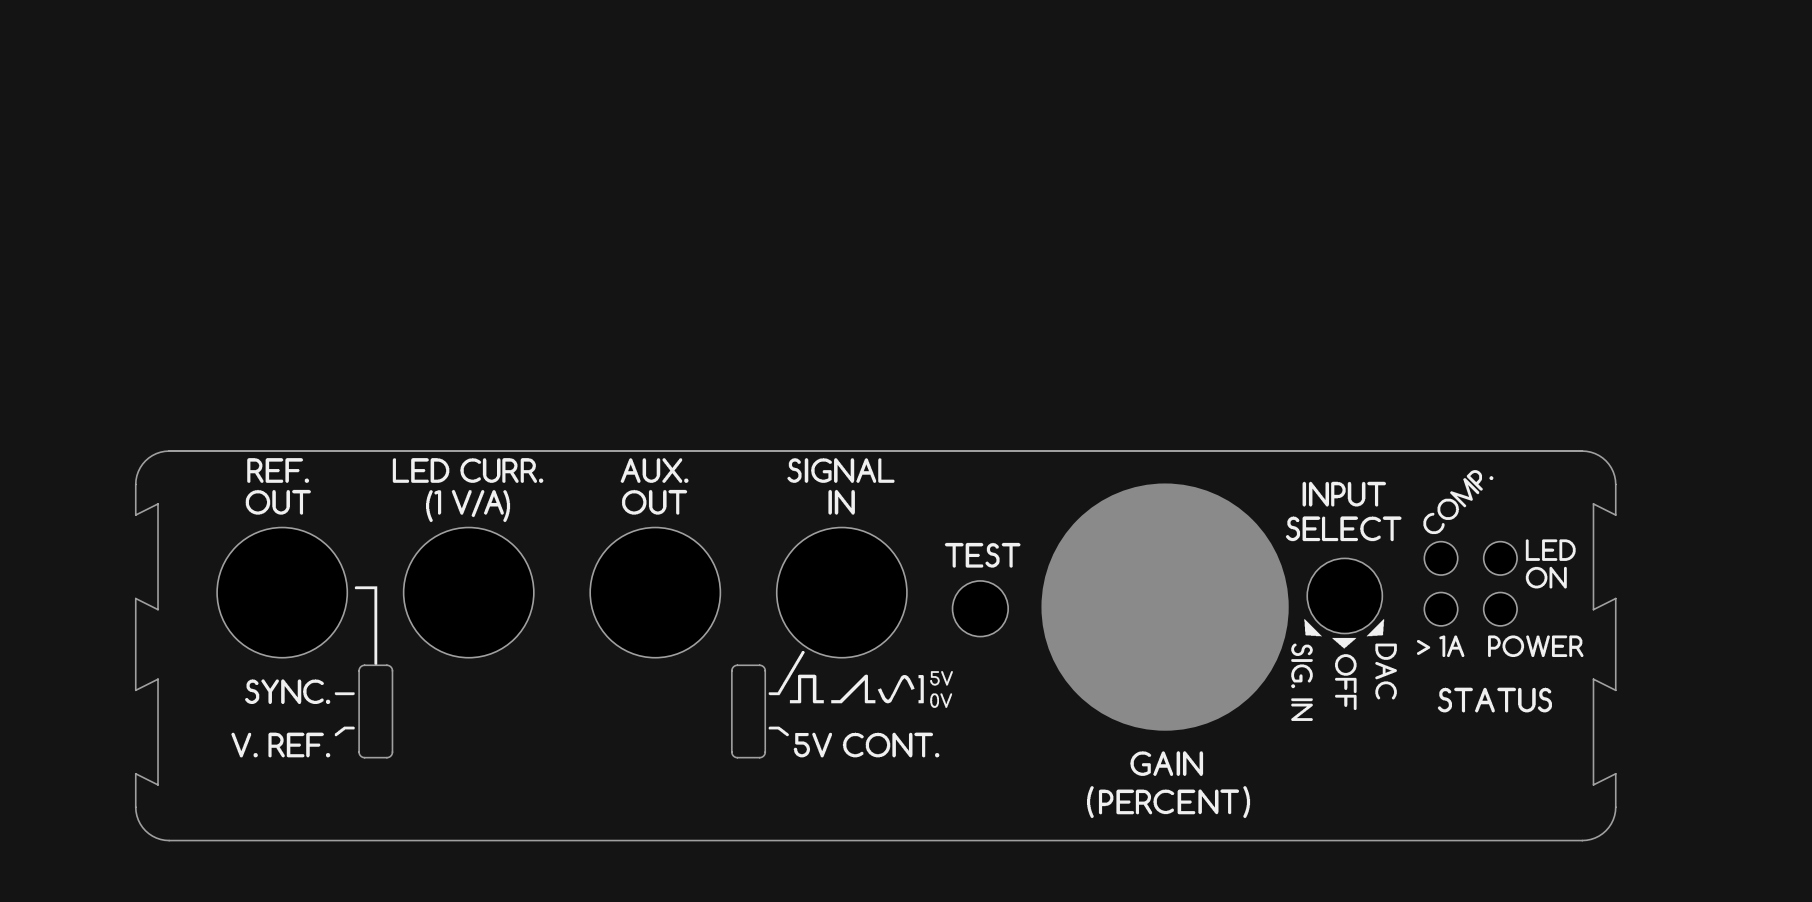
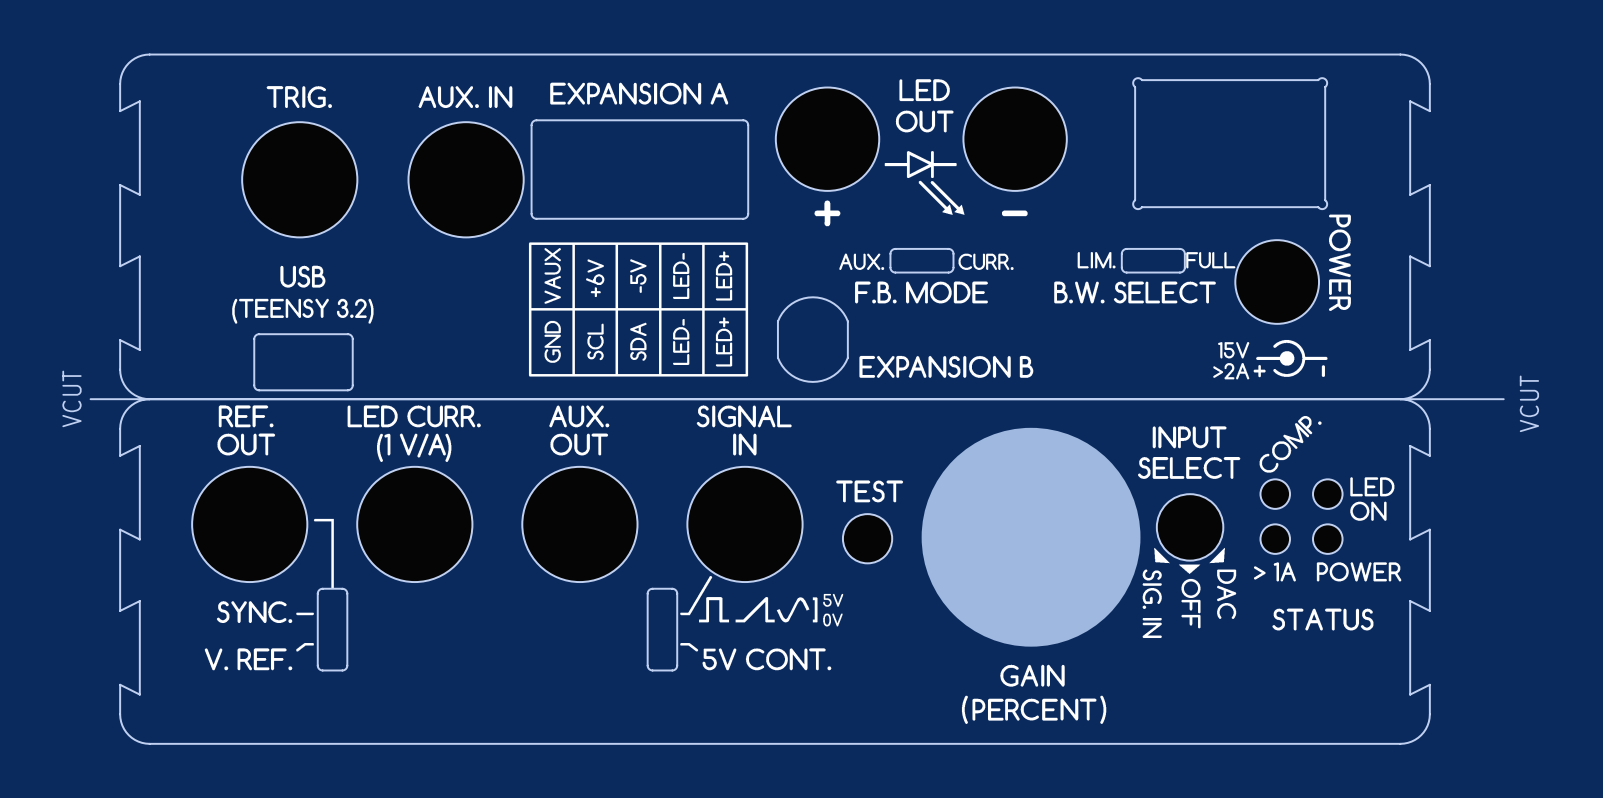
drawing: none -> [895, 79, 954, 133]
board edge: none -> (1142, 80) (1325, 79) (1327, 82) (1325, 87) (1326, 207) (1322, 209) (1318, 207) (1135, 208) (1133, 204) (1135, 200) (1135, 87) (1133, 82) (1136, 78) (1142, 80)
drawing: none -> [550, 82, 729, 105]
drawing: none -> [266, 86, 332, 108]
drawing: none -> [418, 86, 513, 108]
board edge: none -> (536, 120) (745, 120) (748, 125) (747, 215) (743, 218) (534, 218) (531, 213) (531, 125) (536, 120)
hole: none -> (827, 139)
hole: none -> (1015, 139)
drawing: none -> [884, 151, 965, 215]
hole: none -> (299, 179)
hole: none -> (466, 179)
drawing: none -> [814, 200, 841, 227]
drawing: none -> [1001, 210, 1028, 217]
drawing: none -> [1329, 214, 1351, 311]
drawing: none -> [528, 242, 749, 377]
board edge: none -> (895, 248) (950, 249) (953, 253) (953, 269) (948, 272) (893, 272) (890, 268) (890, 253) (895, 248)
board edge: none -> (1126, 248) (1181, 249) (1184, 253) (1184, 269) (1179, 272) (1124, 272) (1121, 268) (1121, 253) (1126, 248)
drawing: none -> [1077, 252, 1116, 269]
drawing: none -> [1186, 252, 1236, 269]
drawing: none -> [839, 253, 1014, 304]
drawing: none -> [630, 259, 647, 294]
drawing: none -> [232, 265, 374, 324]
drawing: none -> [1054, 281, 1216, 304]
hole: none -> (1277, 282)
board edge: none -> (777, 321) (777, 357) (784, 369) (791, 375) (803, 380) (817, 381) (834, 375) (843, 365) (847, 357) (847, 321) (840, 309) (834, 303) (817, 297) (799, 299) (784, 309) (777, 321)
drawing: none -> [630, 322, 647, 361]
drawing: none -> [587, 323, 604, 361]
board edge: none -> (259, 334) (350, 334) (352, 339) (352, 387) (347, 390) (256, 389) (254, 385) (254, 339) (259, 334)
drawing: none -> [1213, 339, 1328, 380]
drawing: none -> [859, 355, 1034, 378]
text: none -> VCUT (71, 398)
board edge: none -> (90, 399) (149, 399) (138, 396) (128, 390) (122, 380) (120, 369) (120, 340) (139, 349) (139, 256) (120, 266) (120, 185) (139, 194) (139, 101) (120, 111) (120, 80) (124, 69) (131, 60) (142, 55) (149, 54) (1407, 55) (1418, 60) (1423, 66) (1429, 80) (1429, 111) (1410, 101) (1410, 194) (1429, 185) (1429, 266) (1410, 256) (1410, 349) (1429, 340) (1429, 369) (1427, 380) (1421, 390) (1411, 396) (1400, 399) (1503, 399)
text: none -> VCUT (1529, 403)

